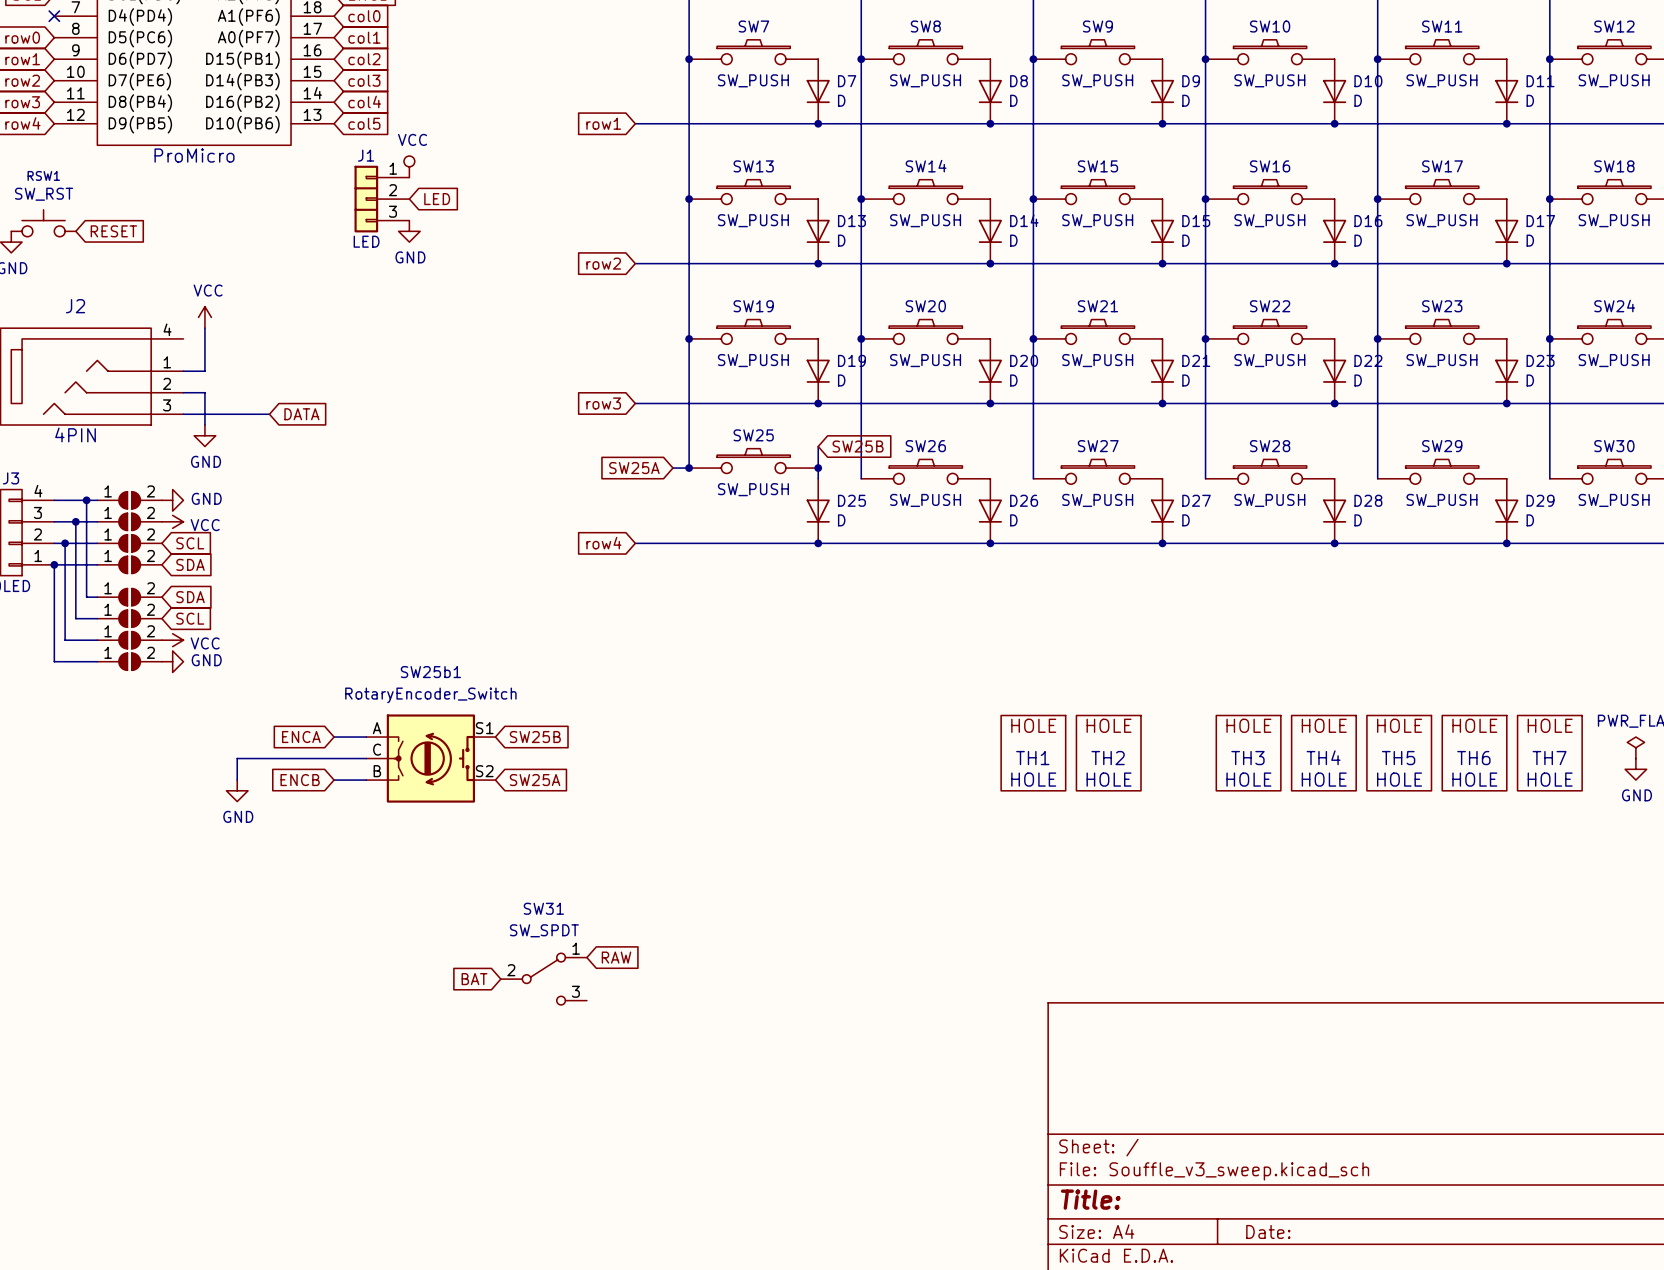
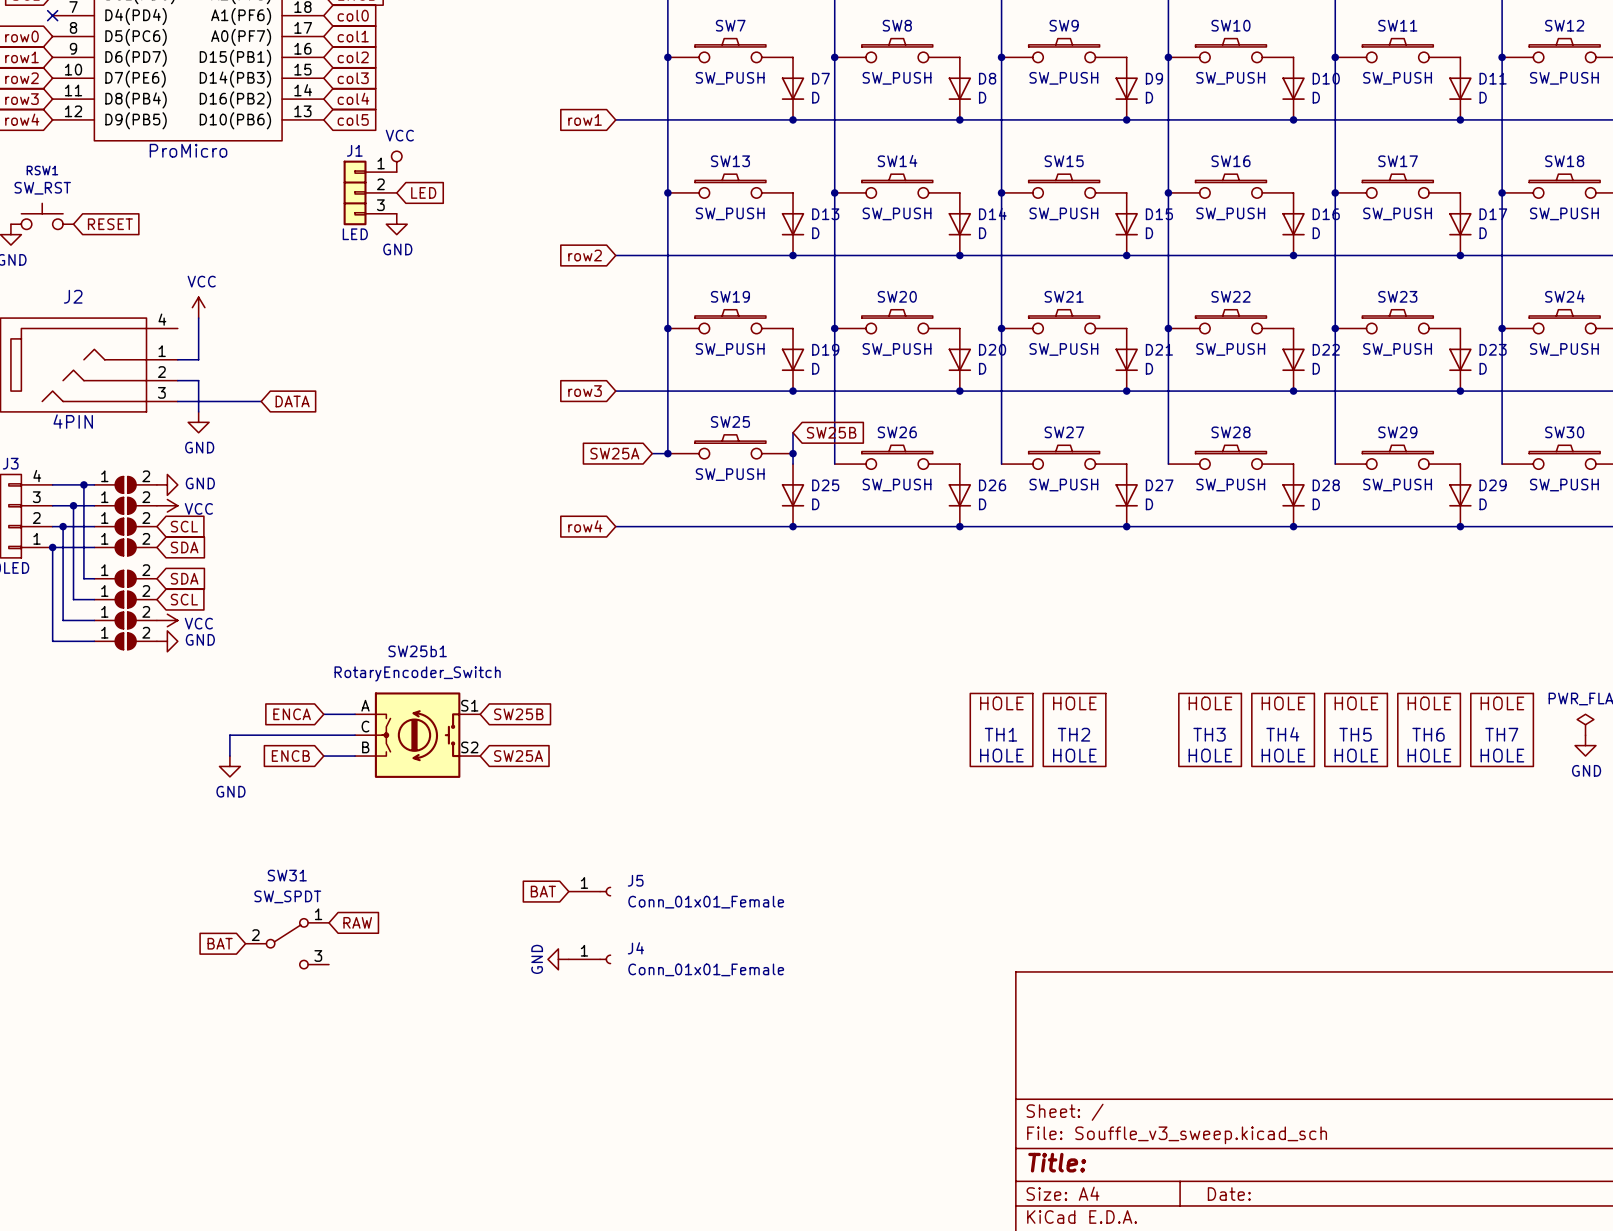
J5: none -> Conn_01x01_Female (589, 891)
global label: none -> RAW (357, 922)
global label: RAW (616, 957) -> none
global label: none -> BAT (220, 943)
global label position: BAT (474, 979) -> BAT (543, 891)
SW31 position: (543, 979) -> (287, 943)
power symbol: none -> GND (558, 959)
J4: none -> Conn_01x01_Female (589, 959)

